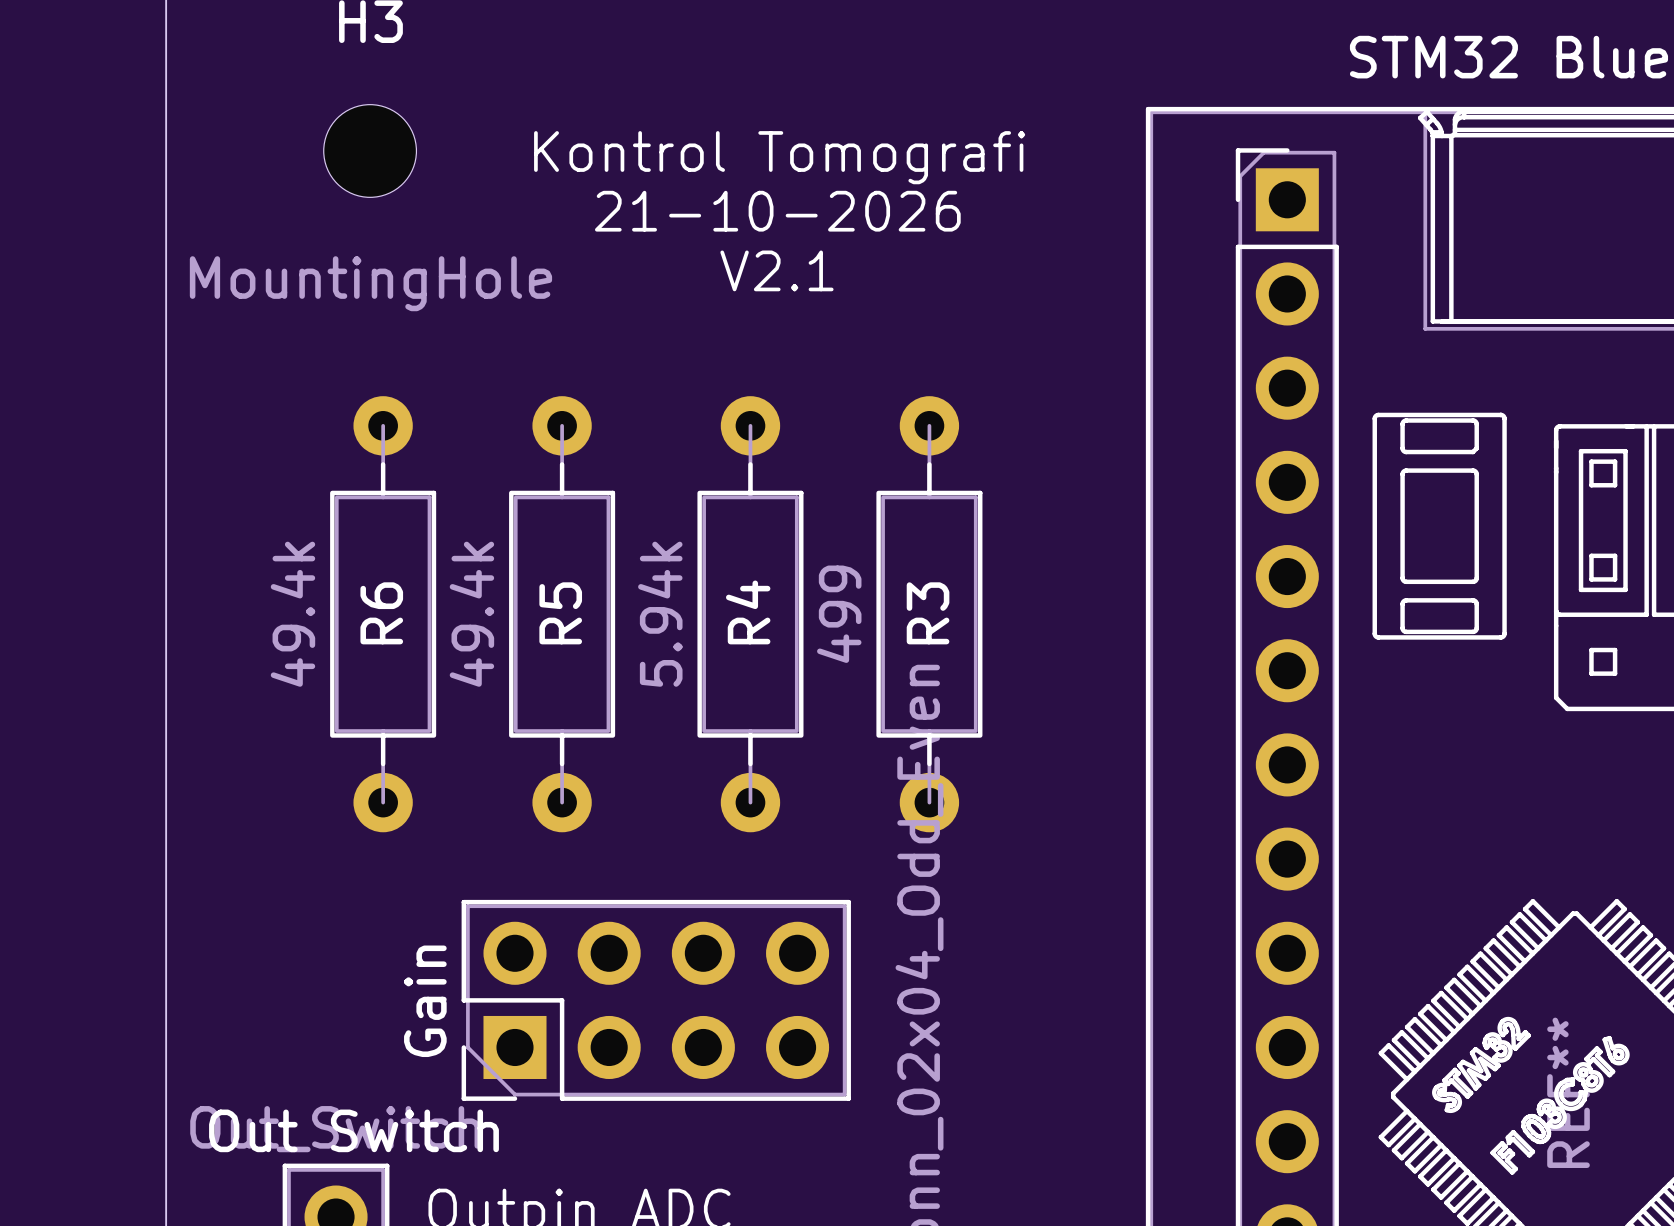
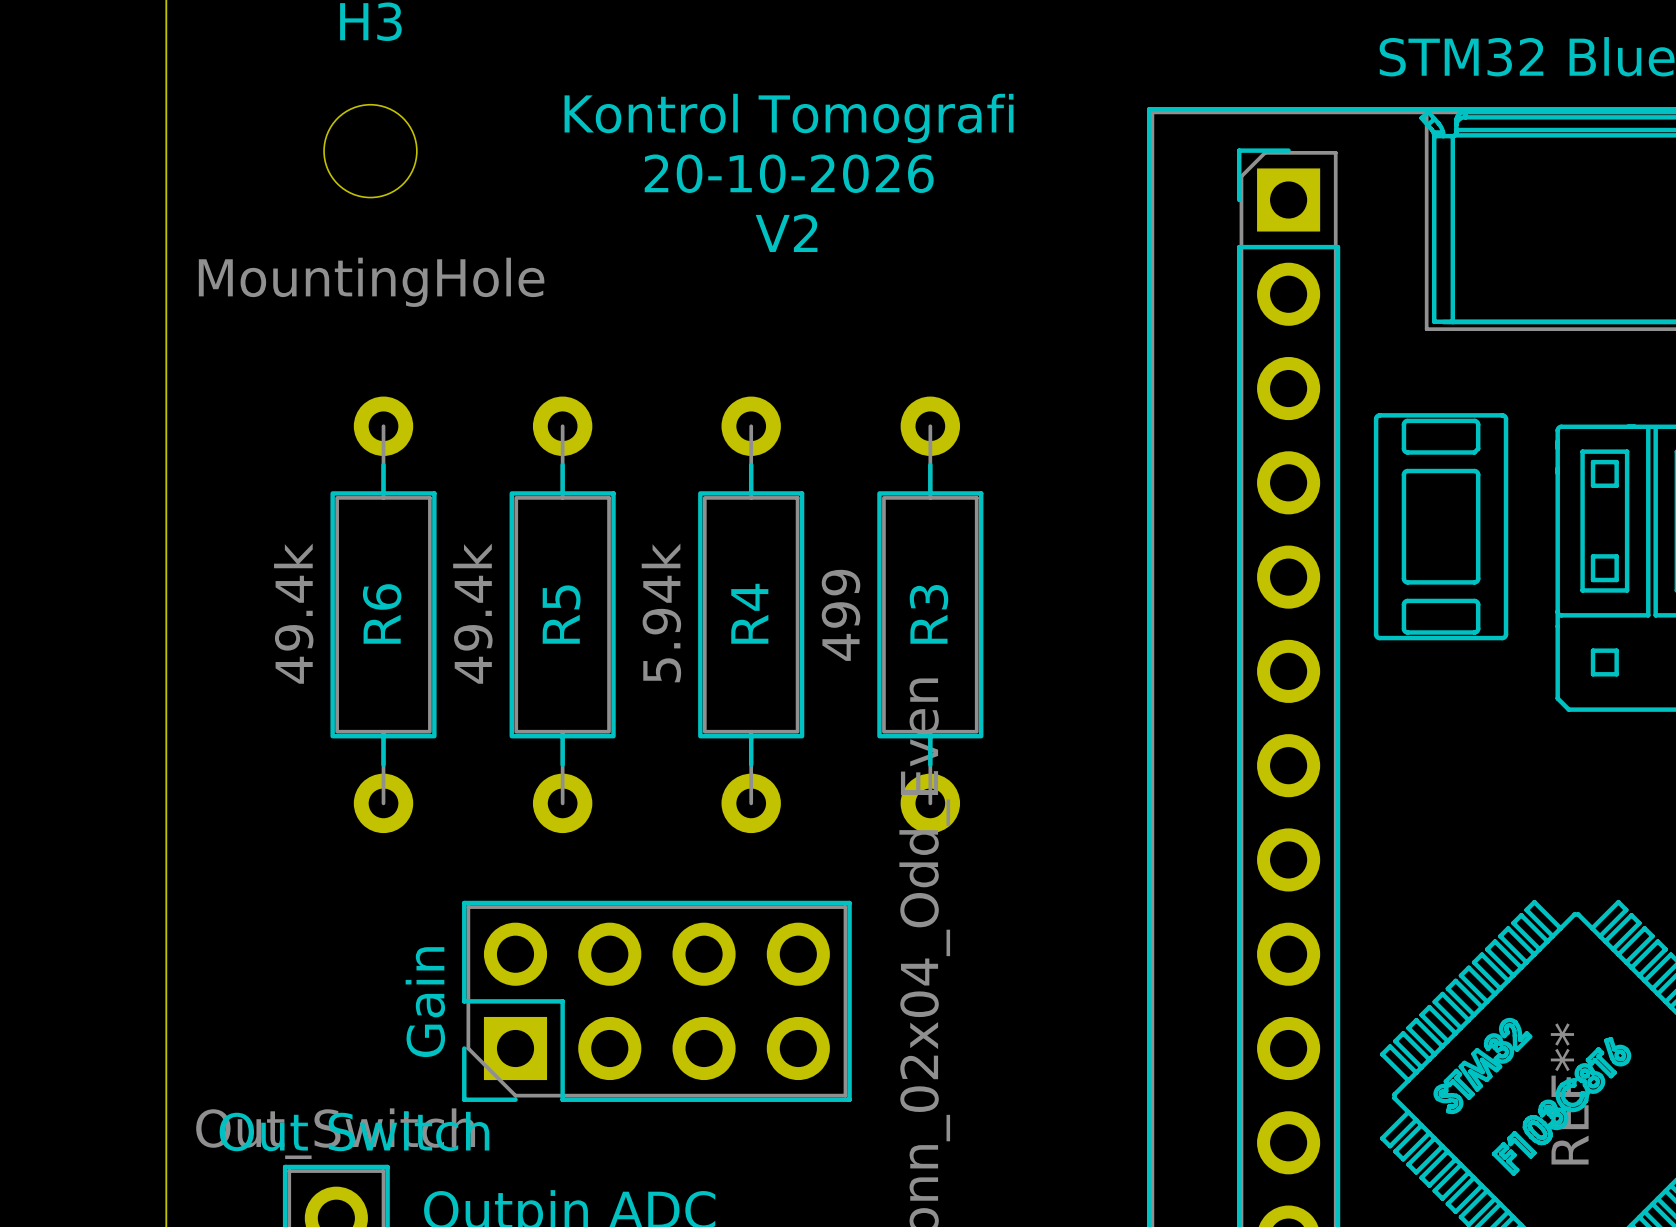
text position: Kontrol Tomografi (779, 157) -> Kontrol Tomografi (789, 118)
text: 21-10-2026 (777, 211) -> 20-10-2026 (789, 173)
text: V2.1 (776, 270) -> V2 (786, 233)

